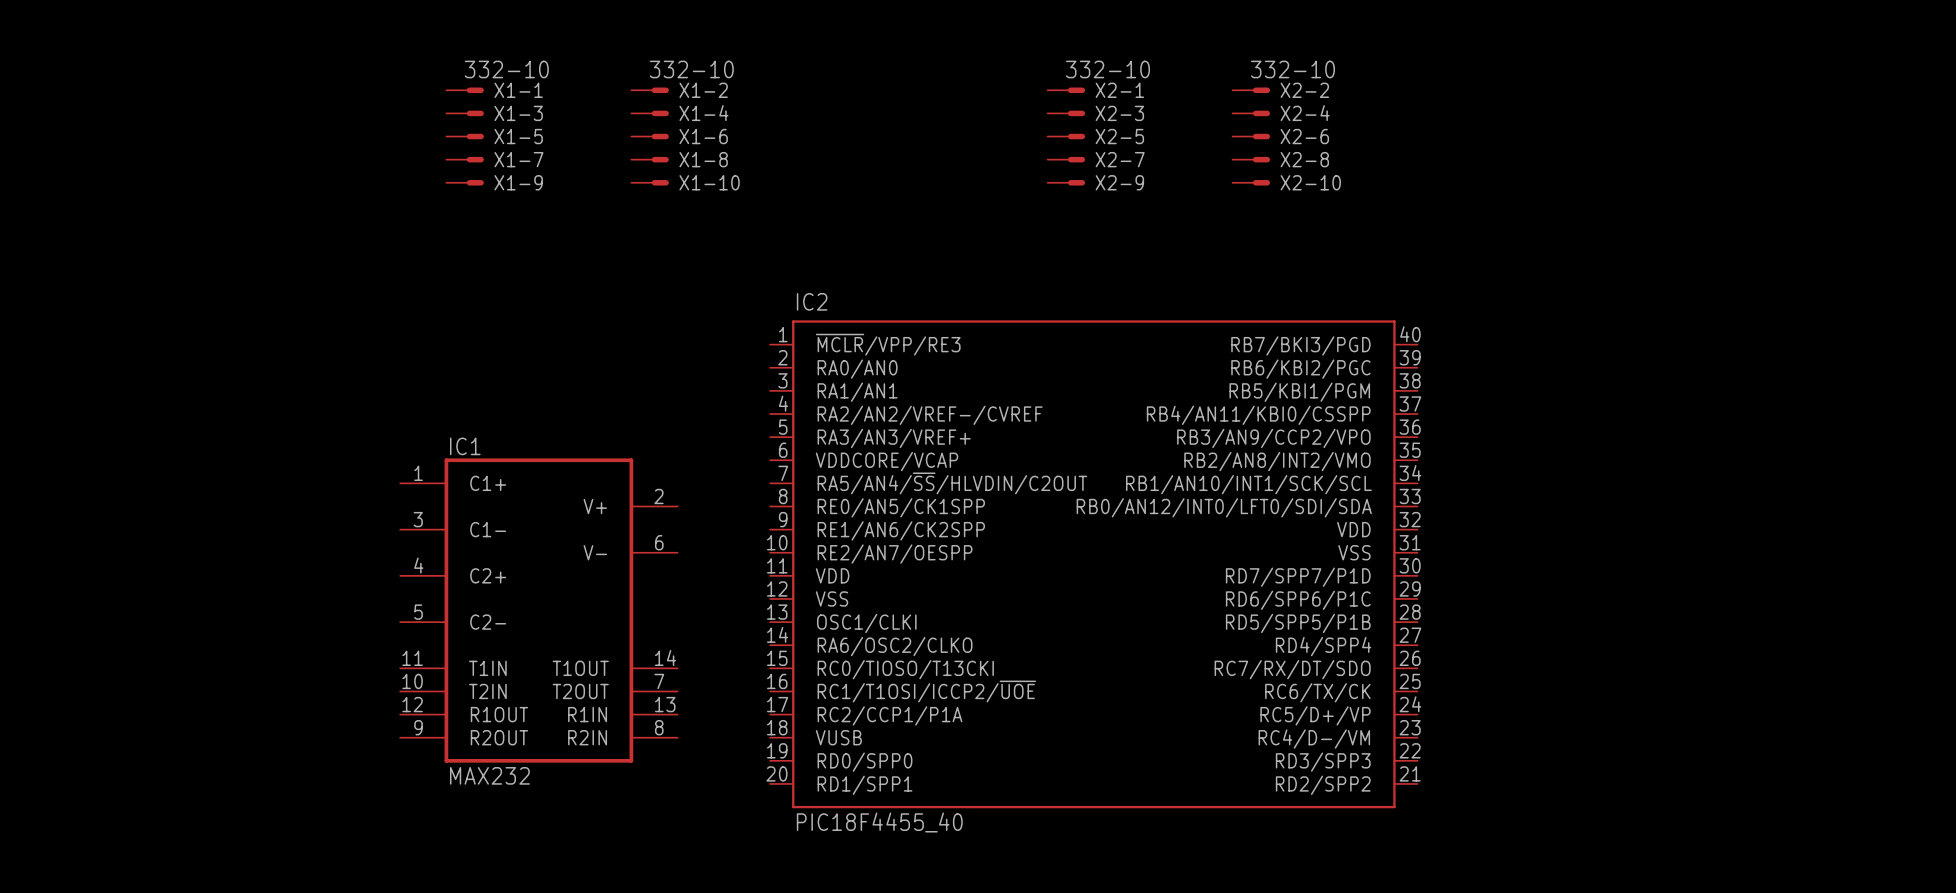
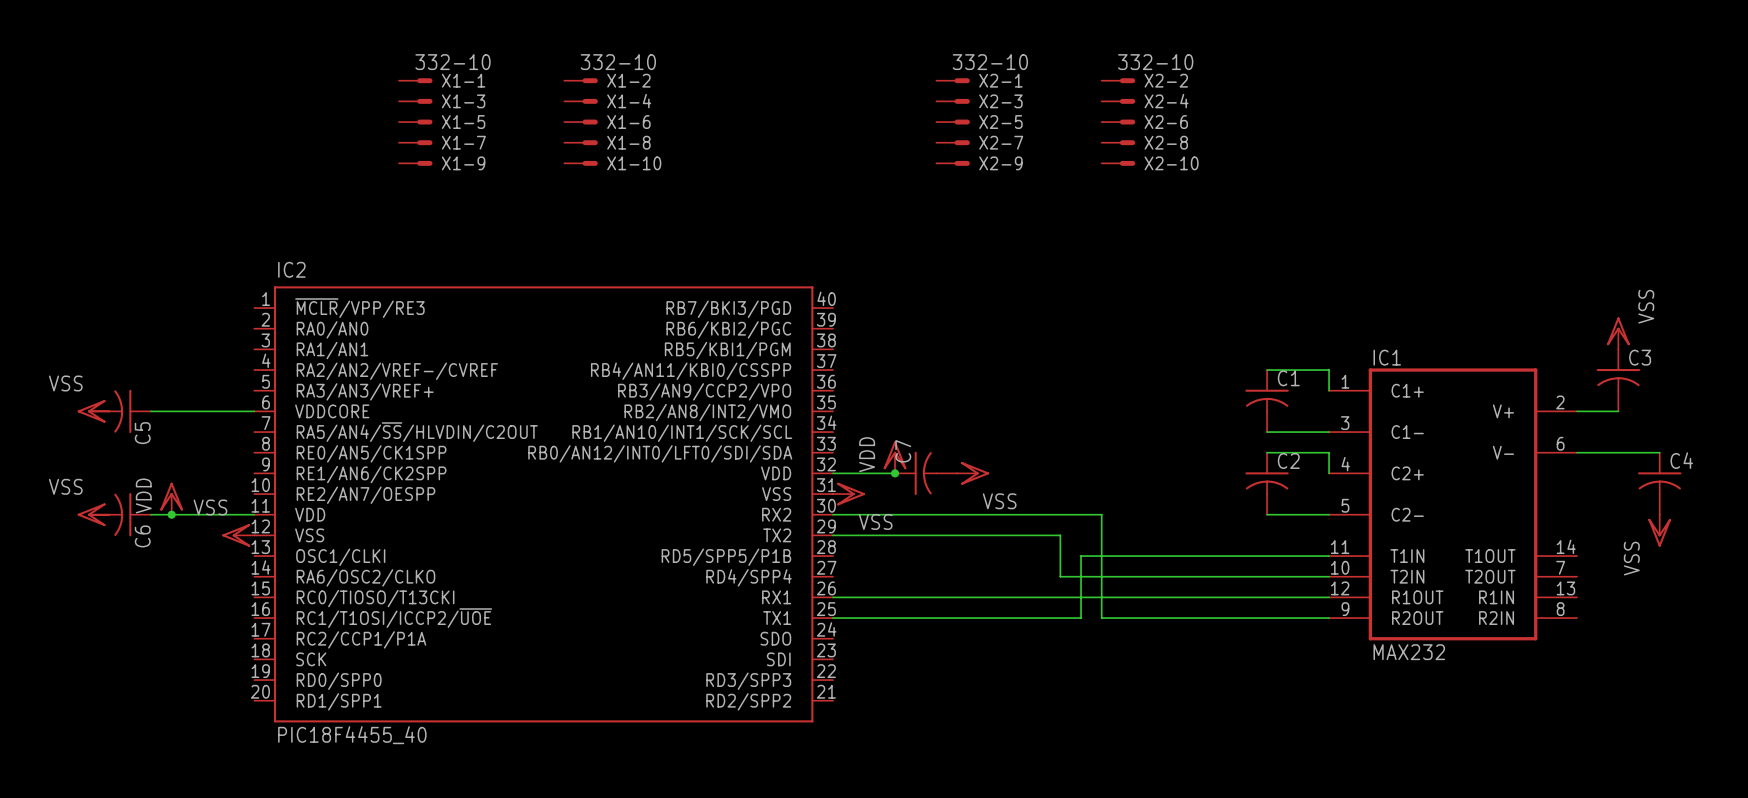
power symbol: none -> VSS (1618, 333)
wire: none -> (1267, 370) (1329, 370) (1329, 390)
C3: none -> (1618, 380)
C1: none -> (1267, 401)
power symbol: none -> VSS (93, 411)
C5: none -> (120, 411)
wire: none -> (151, 411) (254, 411)
wire: none -> (1577, 411) (1618, 411)
IC2 pin name: VDDCORE/VCAP (887, 461) -> VDDCORE (332, 411)
wire: none -> (1267, 432) (1329, 432)
wire: none -> (1267, 452) (1329, 452) (1329, 473)
wire: none -> (1577, 452) (1659, 452)
power symbol: none -> VDD (895, 457)
wire: none -> (833, 473) (895, 473)
junction: none -> (895, 473)
C7: none -> (926, 473)
power symbol: none -> VSS (973, 473)
C2: none -> (1267, 483)
C4: none -> (1659, 483)
power symbol: none -> VSS (849, 494)
power symbol: none -> VDD (171, 498)
IC2 position: (1093, 564) -> (543, 504)
power symbol: none -> VSS (93, 514)
C6: none -> (120, 514)
wire: none -> (151, 514) (254, 514)
junction: none -> (171, 514)
wire: none -> (833, 514) (1101, 514) (1101, 618) (1329, 618)
wire: none -> (1267, 514) (1329, 514)
IC2 pin name: RD7/SPP7/P1D (1298, 577) -> RX2 (776, 514)
power symbol: none -> VSS (1659, 530)
power symbol: none -> VSS (238, 535)
wire: none -> (833, 535) (1060, 535) (1060, 576) (1329, 576)
IC2 pin name: RD6/SPP6/P1C (1298, 600) -> TX2 (777, 535)
IC1 position: (538, 610) -> (1453, 504)
wire: none -> (1329, 556) (1081, 556) (1081, 618) (833, 618)
wire: none -> (833, 597) (1329, 597)
IC2 pin name: RC7/RX/DT/SDO (1292, 669) -> RX1 (776, 597)
IC2 pin name: RC6/TX/CK (1317, 692) -> TX1 (777, 618)
IC2 pin name: RC5/D+/VP (1315, 715) -> SDO (775, 638)
IC2 pin name: VUSB (838, 737) -> SCK (311, 659)
IC2 pin name: RC4/D-/VM (1314, 739) -> SDI (778, 659)

